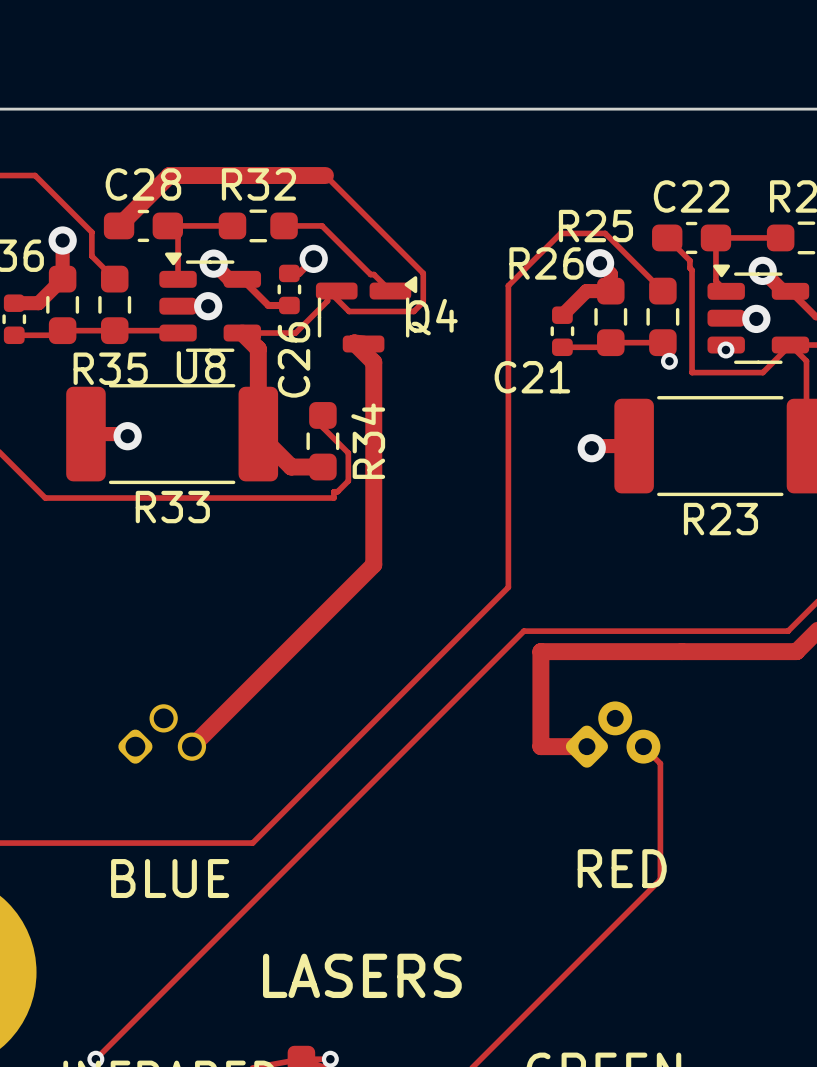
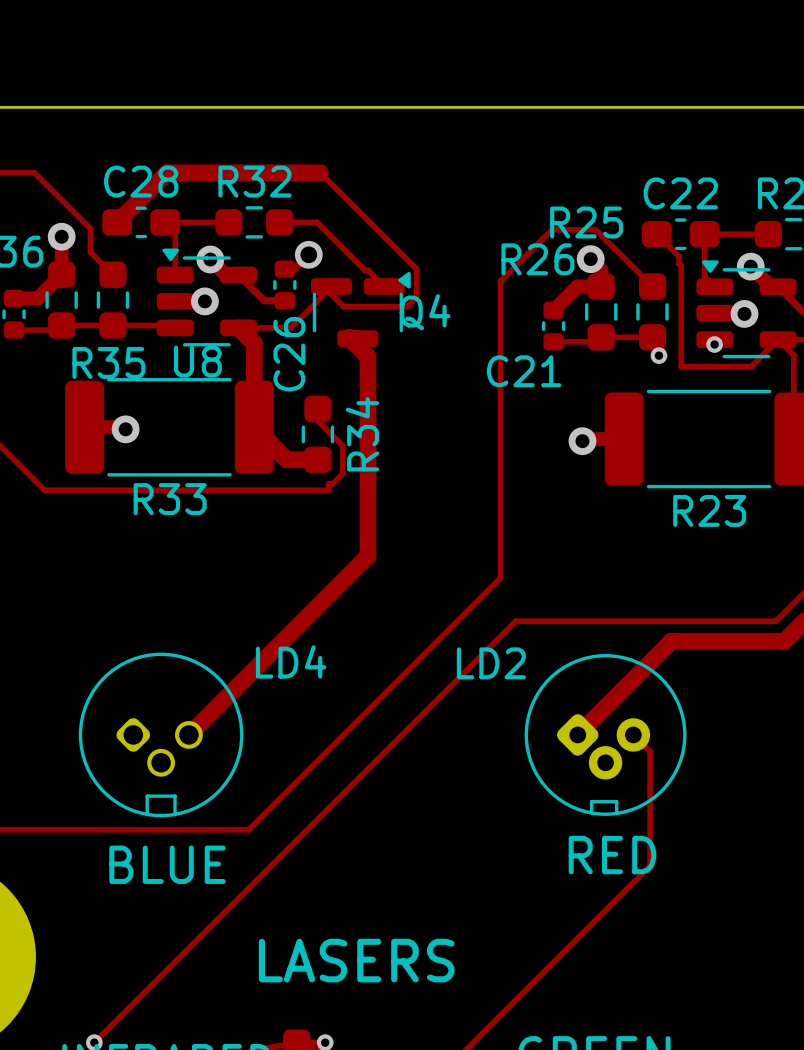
track: (681, 651) (540, 651) (540, 746) (586, 746) -> (671, 641) (577, 734)
LD4 side: bottom (162, 733) -> top (161, 734)
LD2 side: bottom (613, 734) -> top (605, 734)

